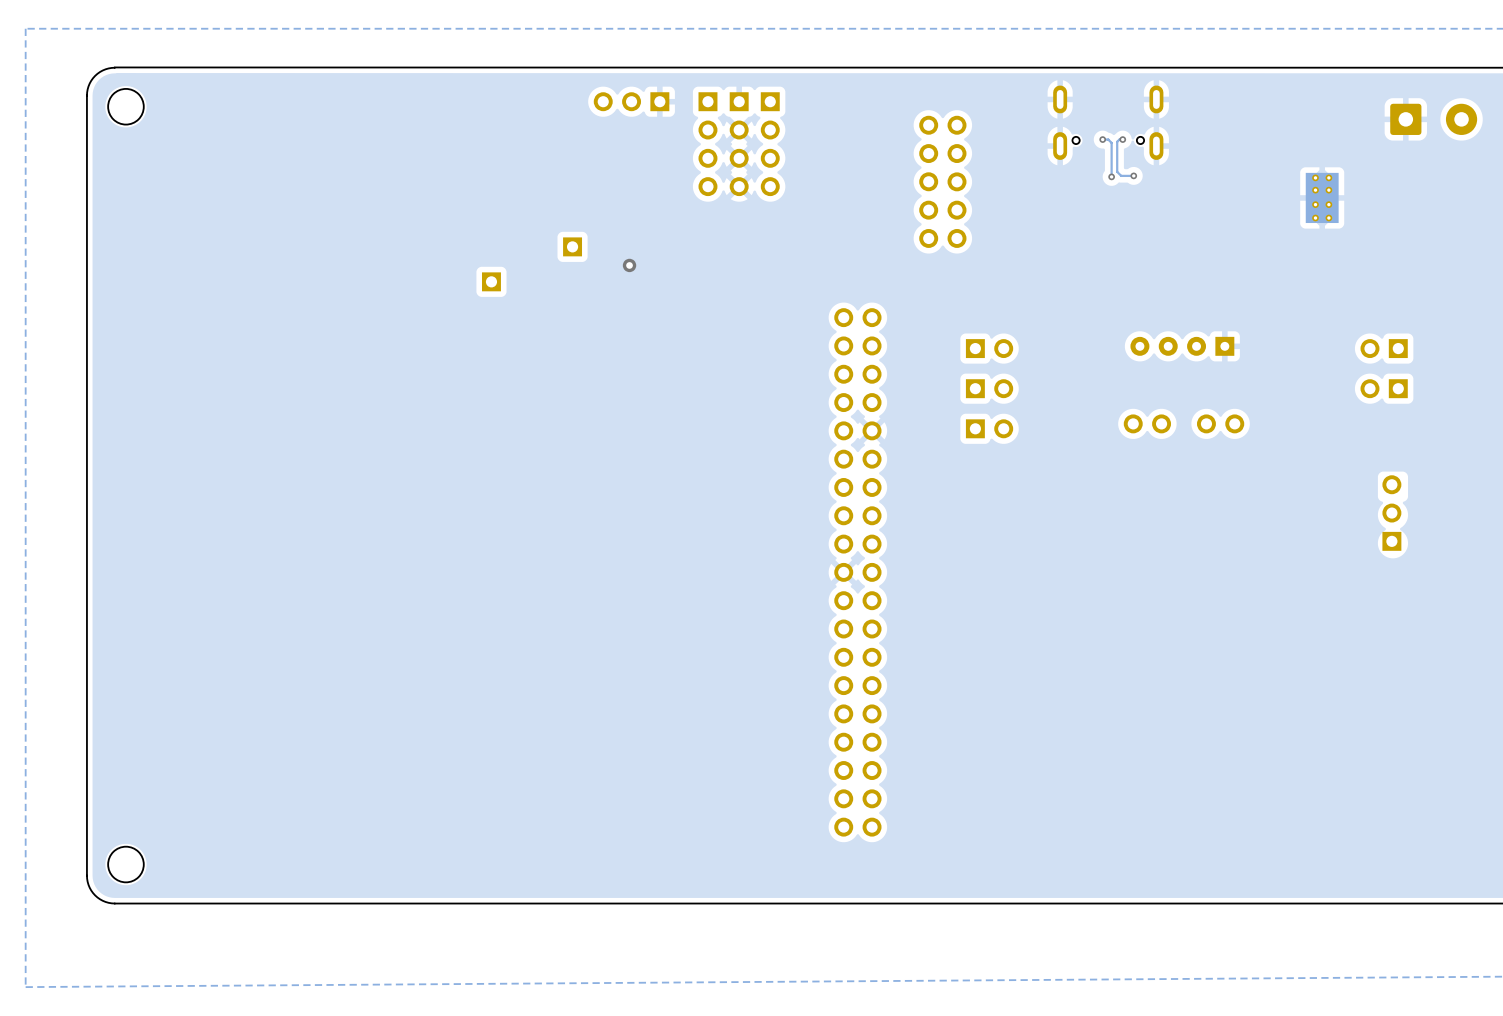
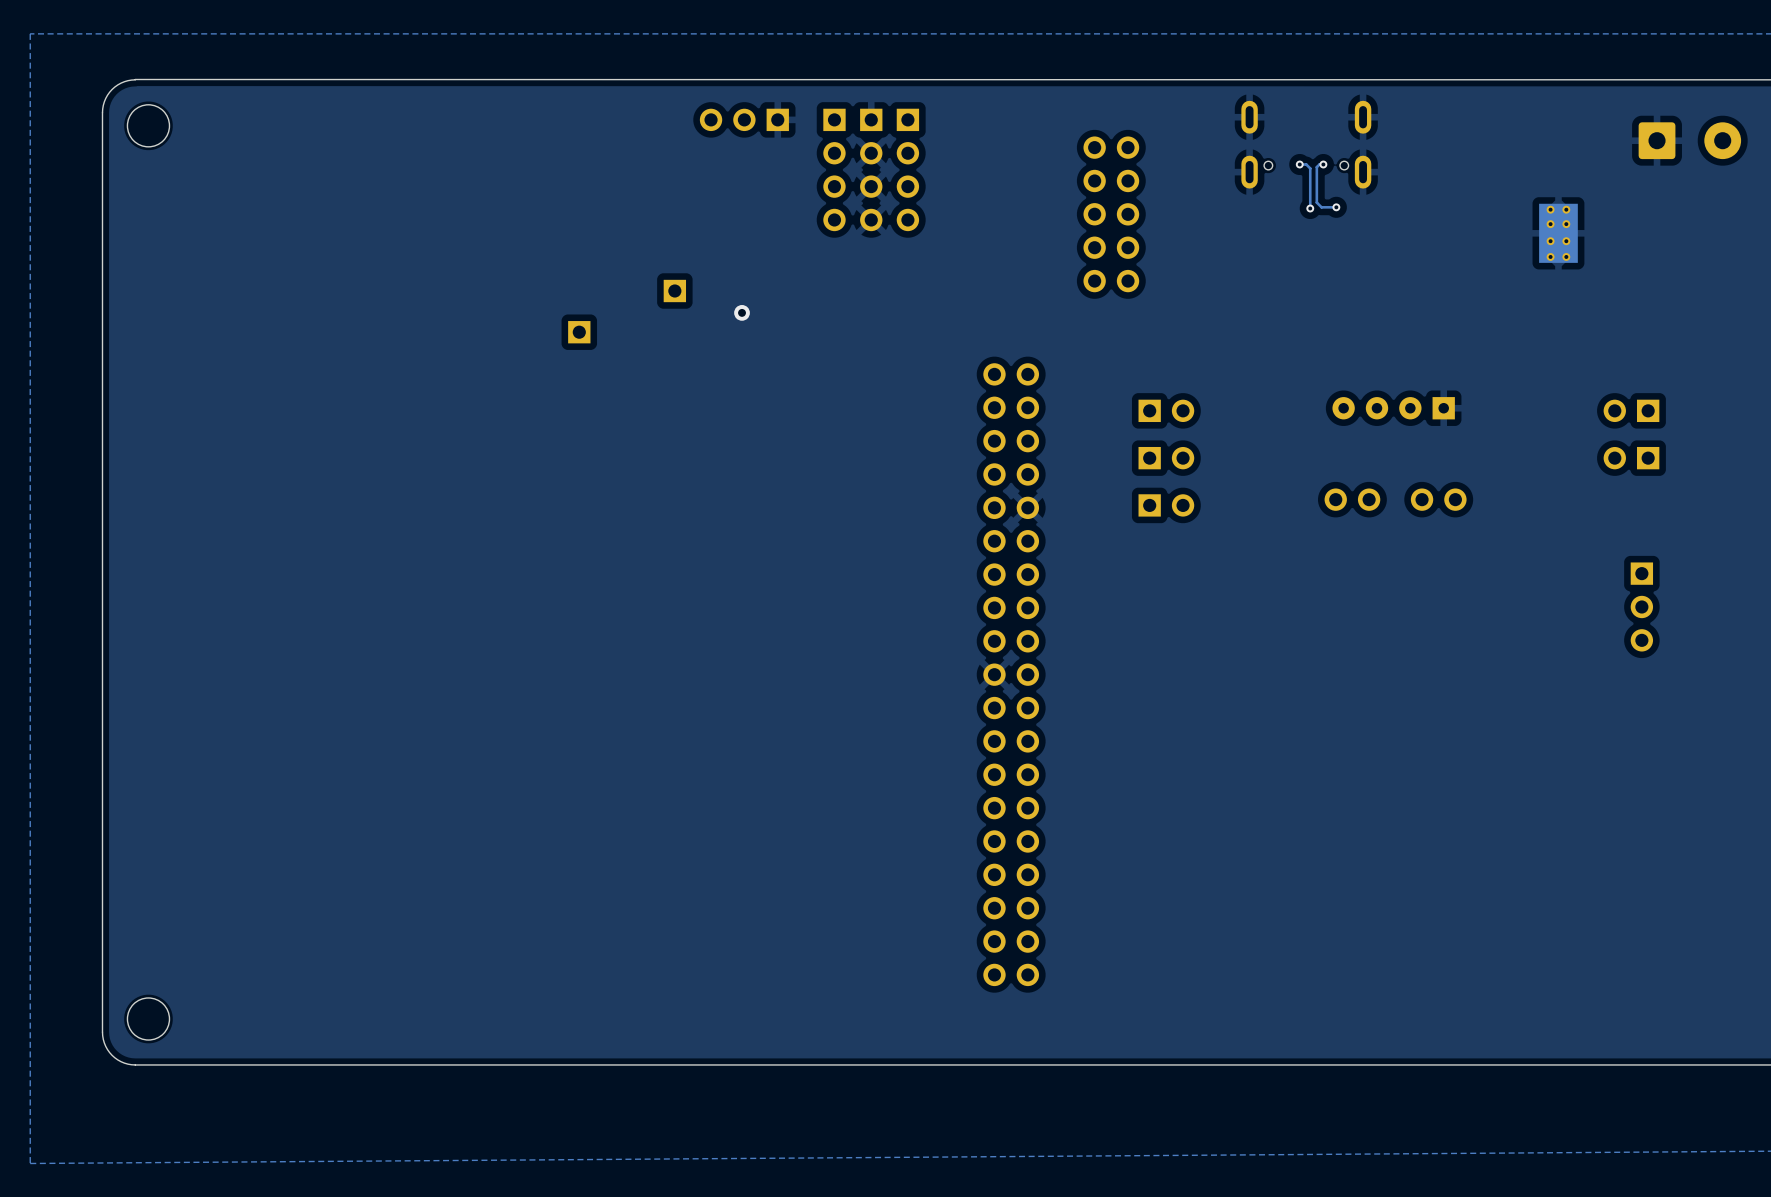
part rotation: 0° (1391, 513) -> 180° (1641, 606)

